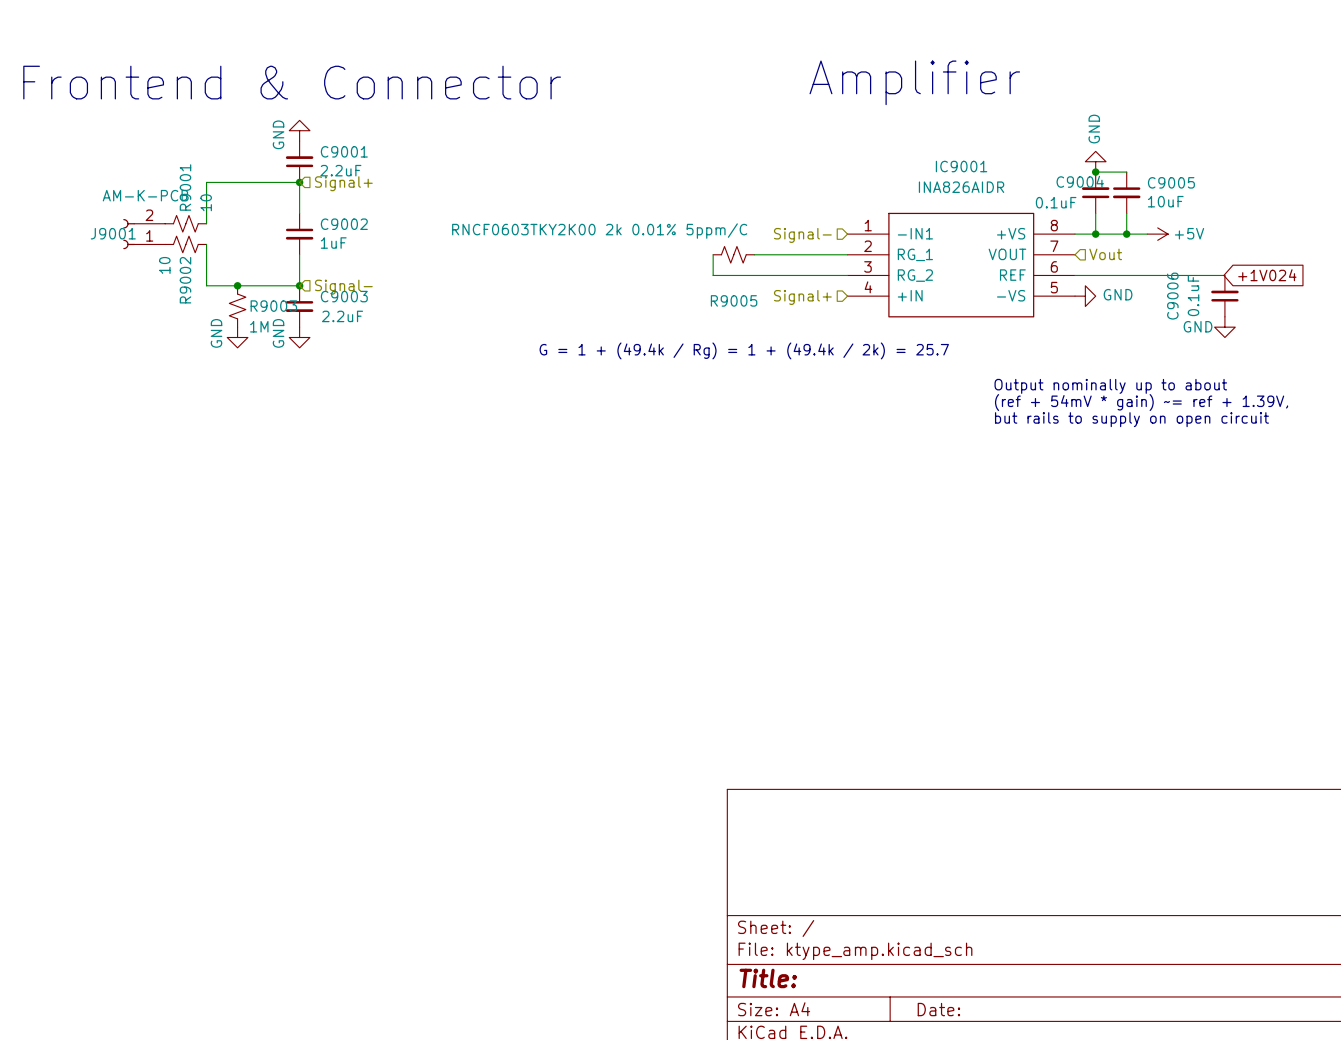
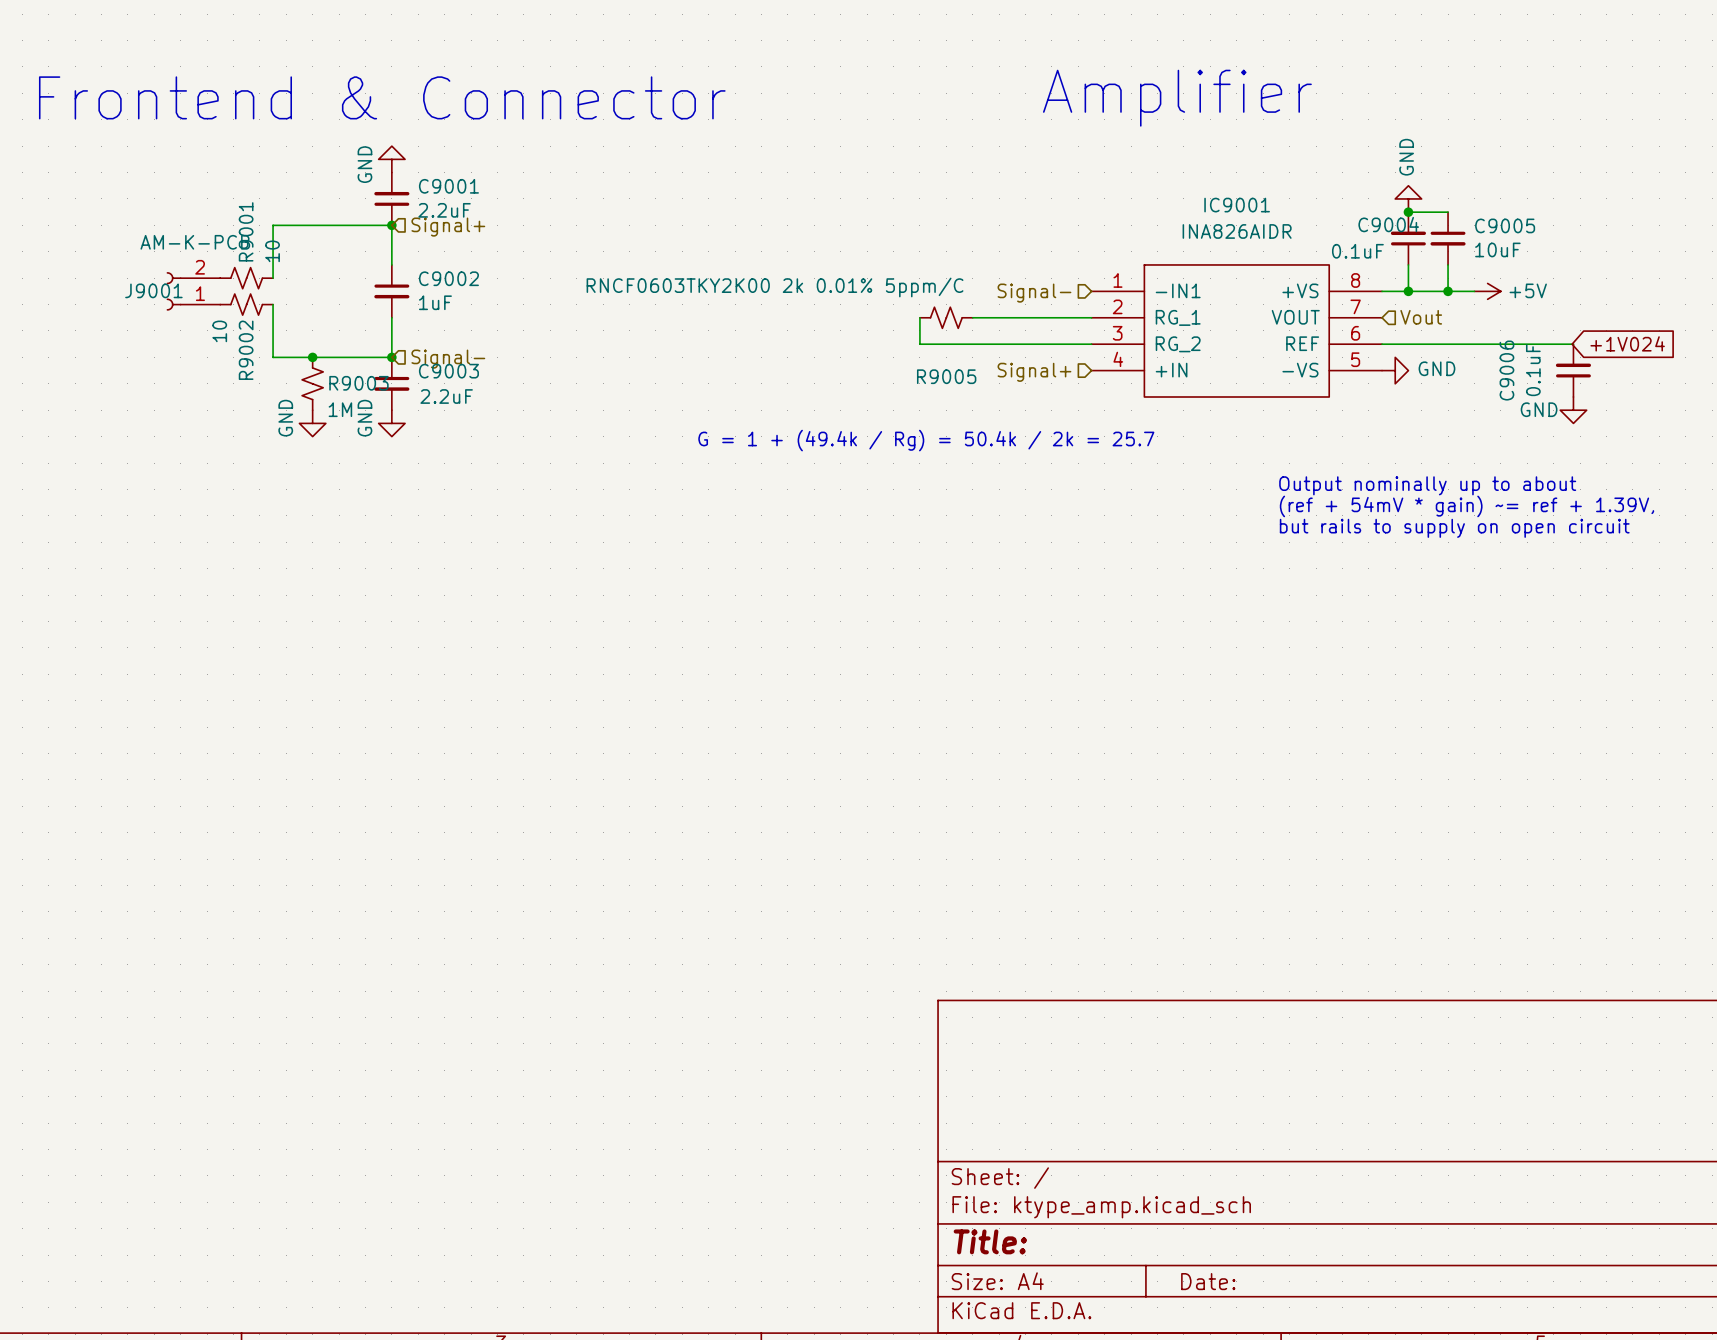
text: G = 1 + (49.4k / Rg) = 1 + (49.4k / 2k) = 25.7 (744, 350) -> G = 1 + (49.4k / Rg) = 50.4k / 2k = 25.7 (926, 440)

